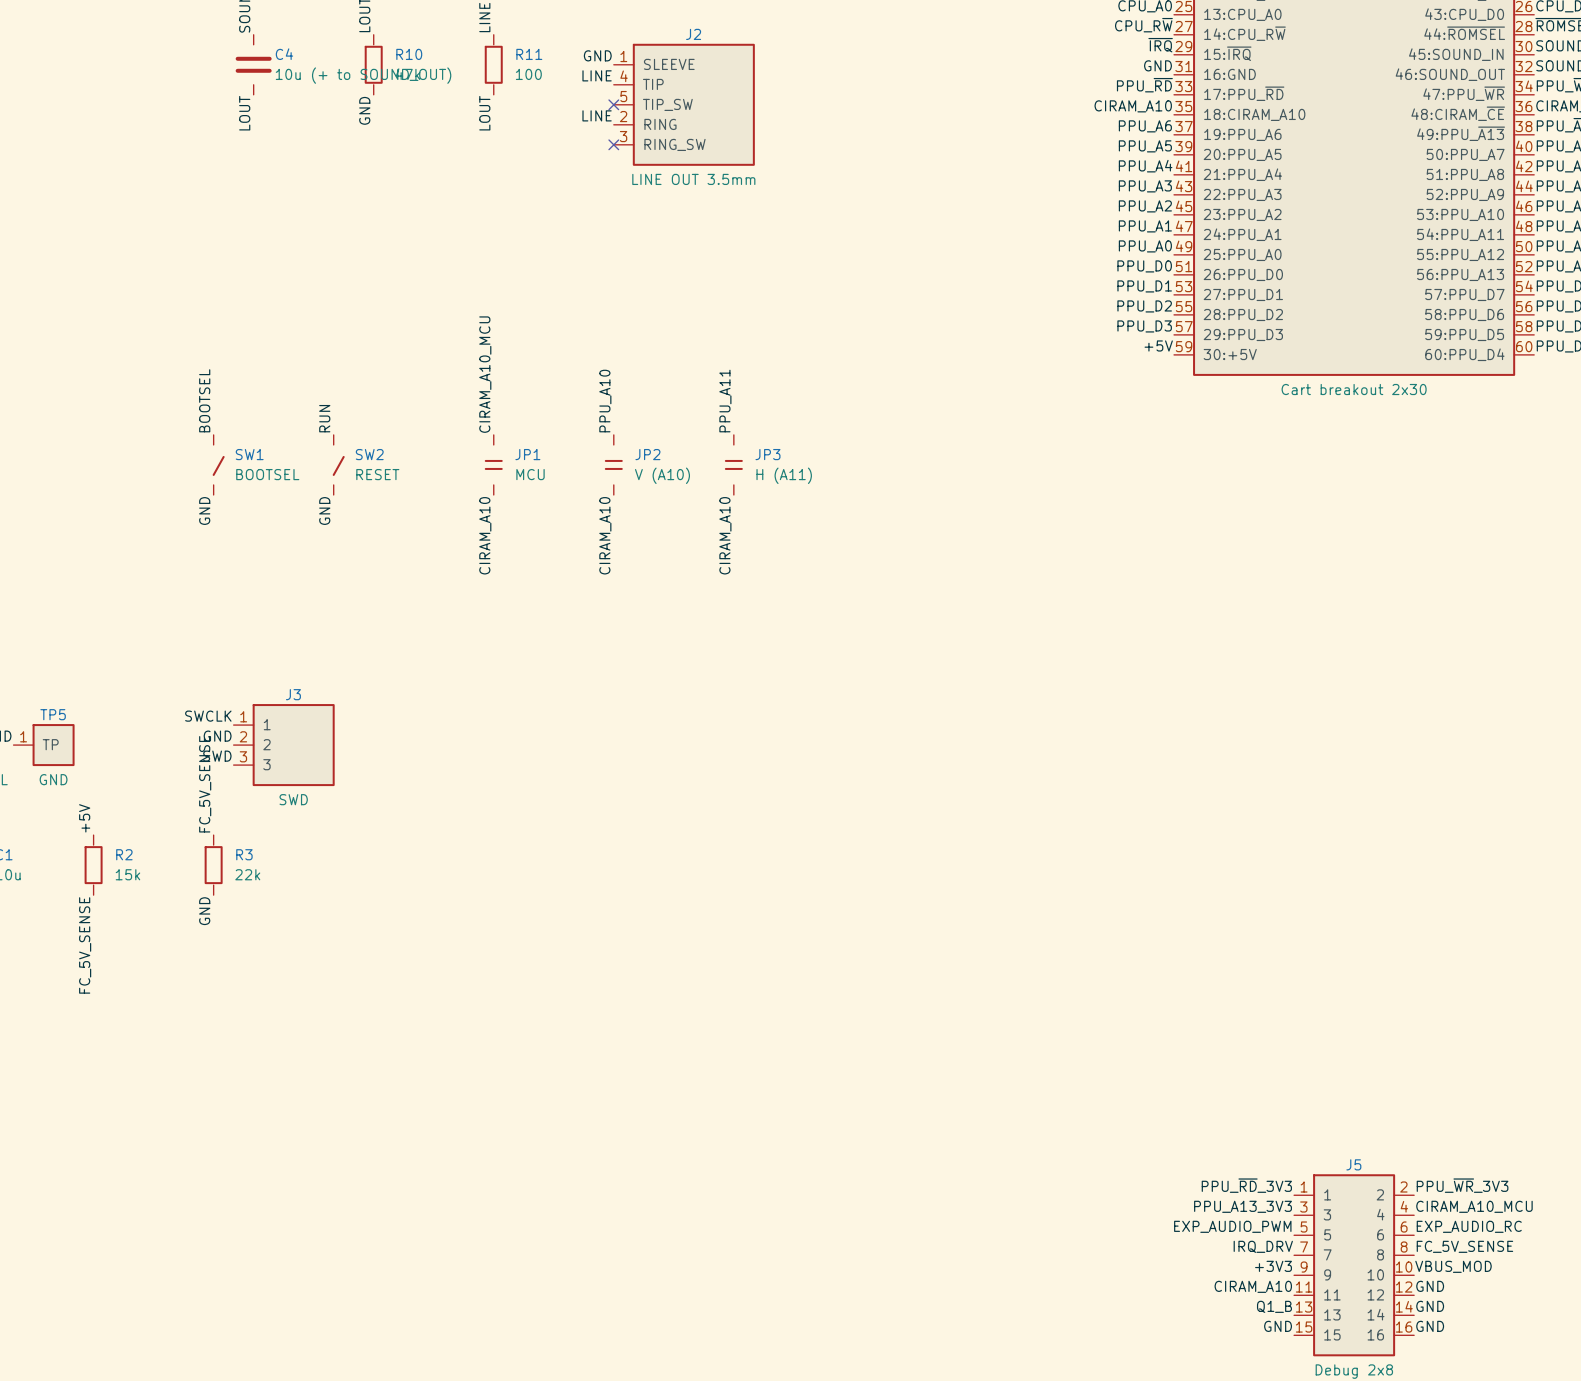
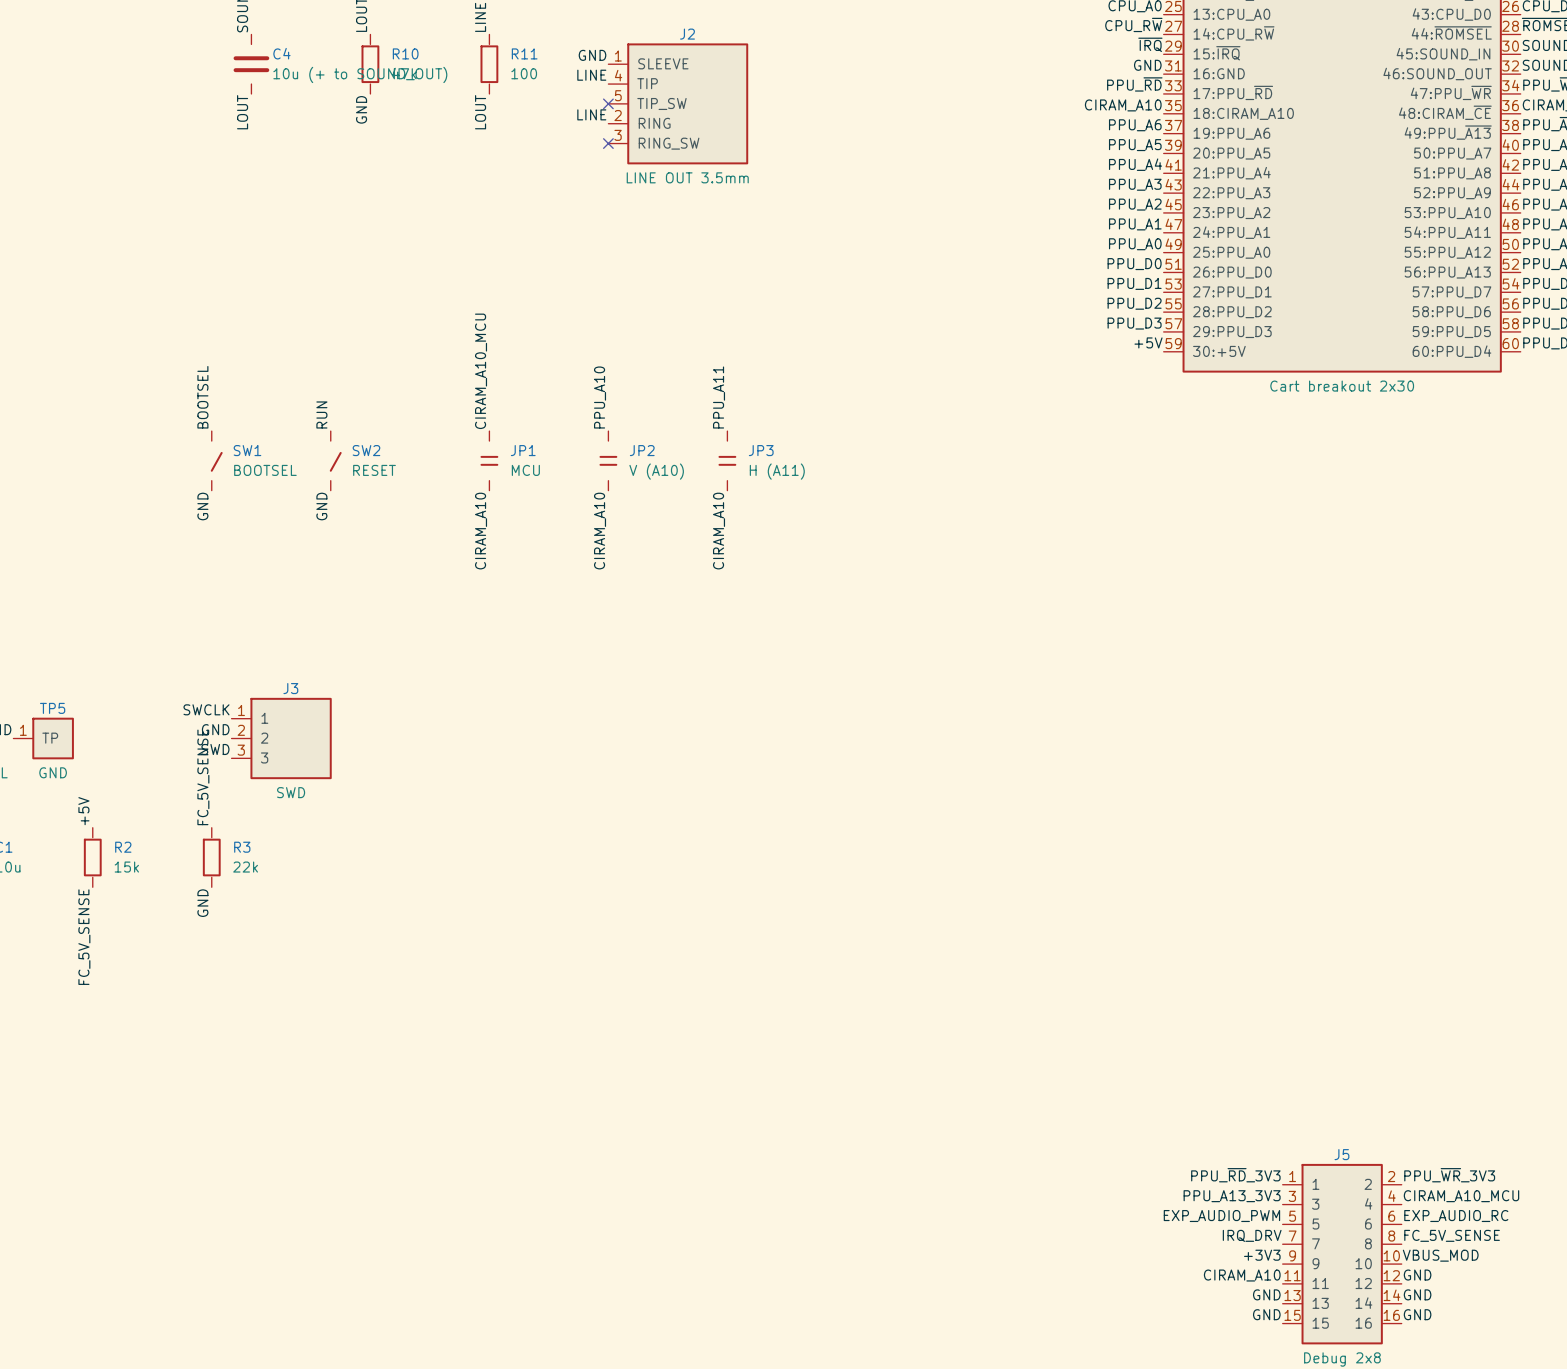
label: Q1_B (1274, 1306) -> GND (1266, 1294)

